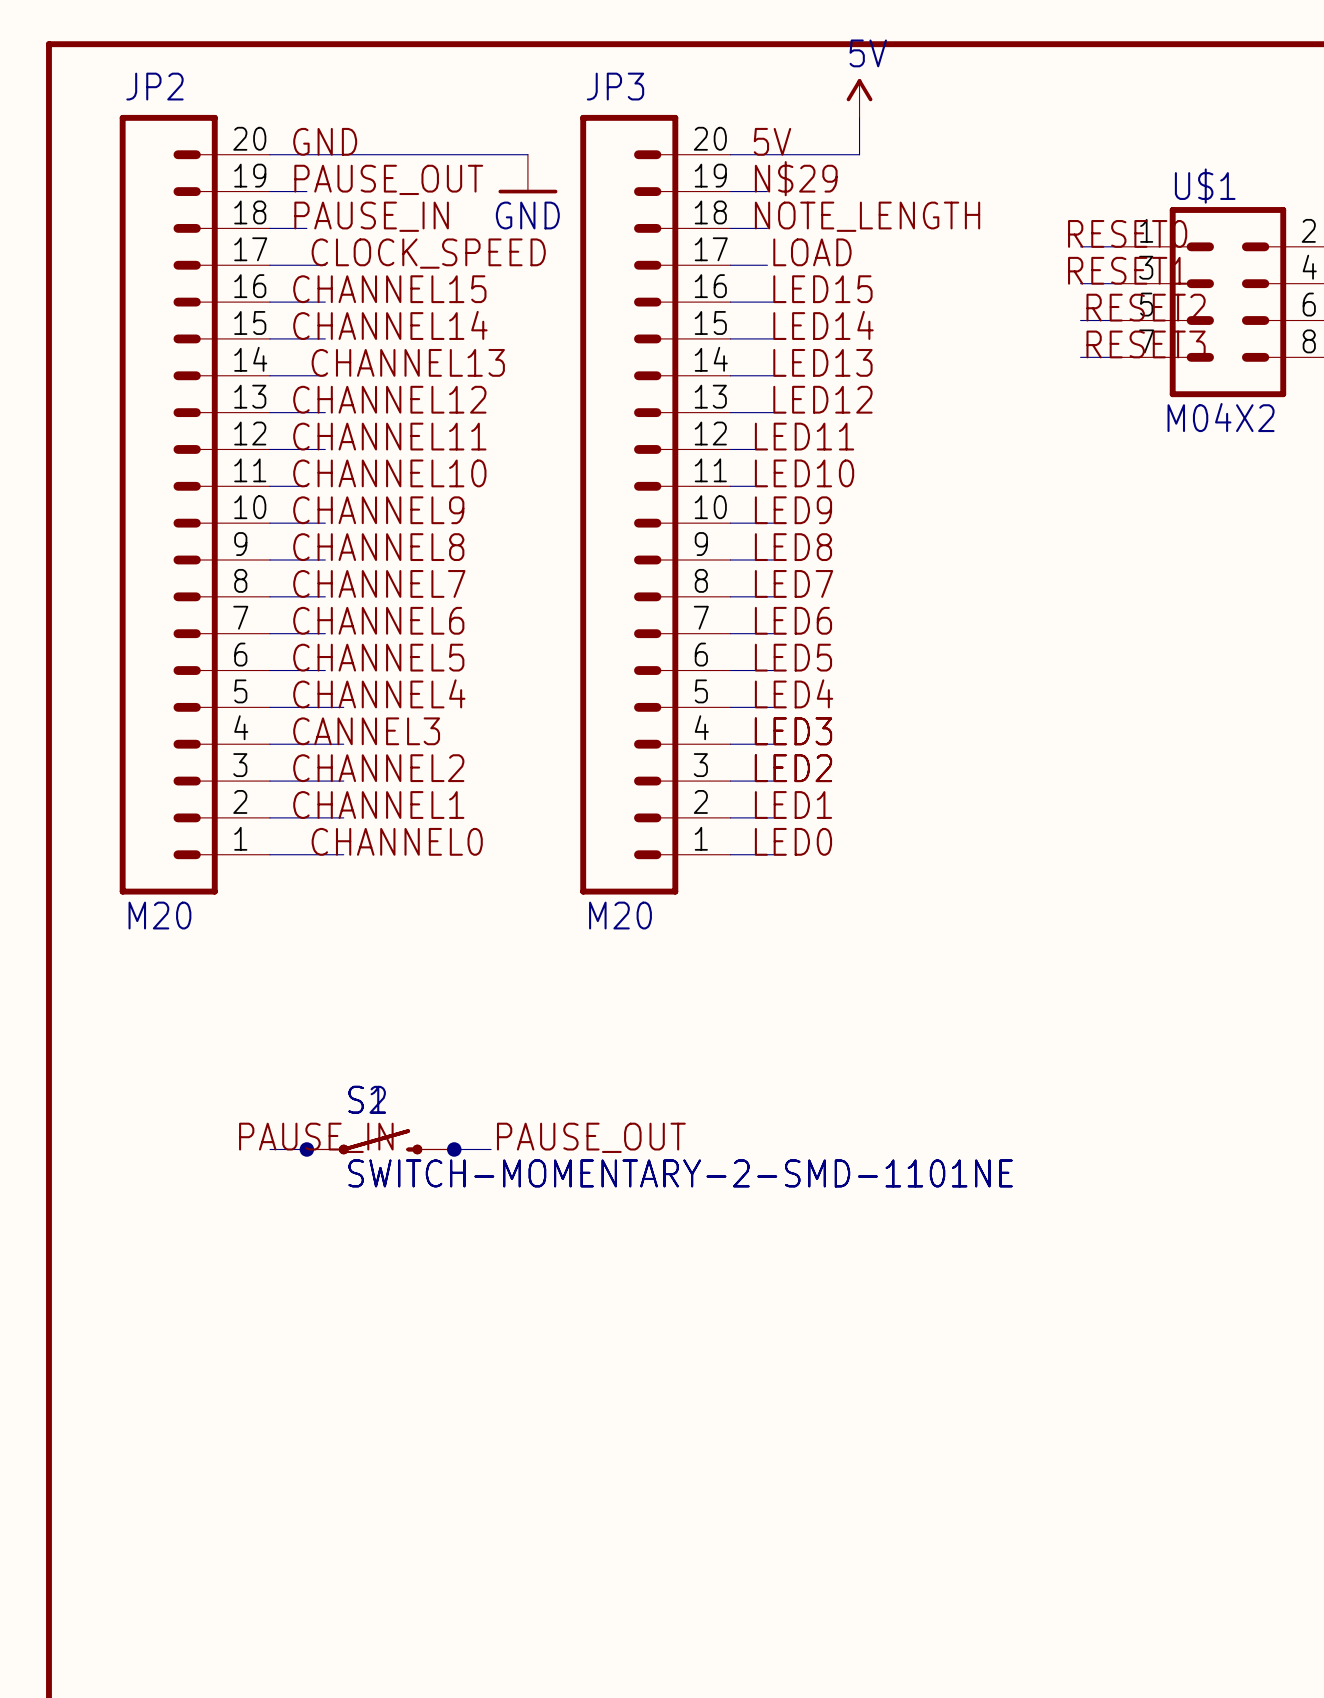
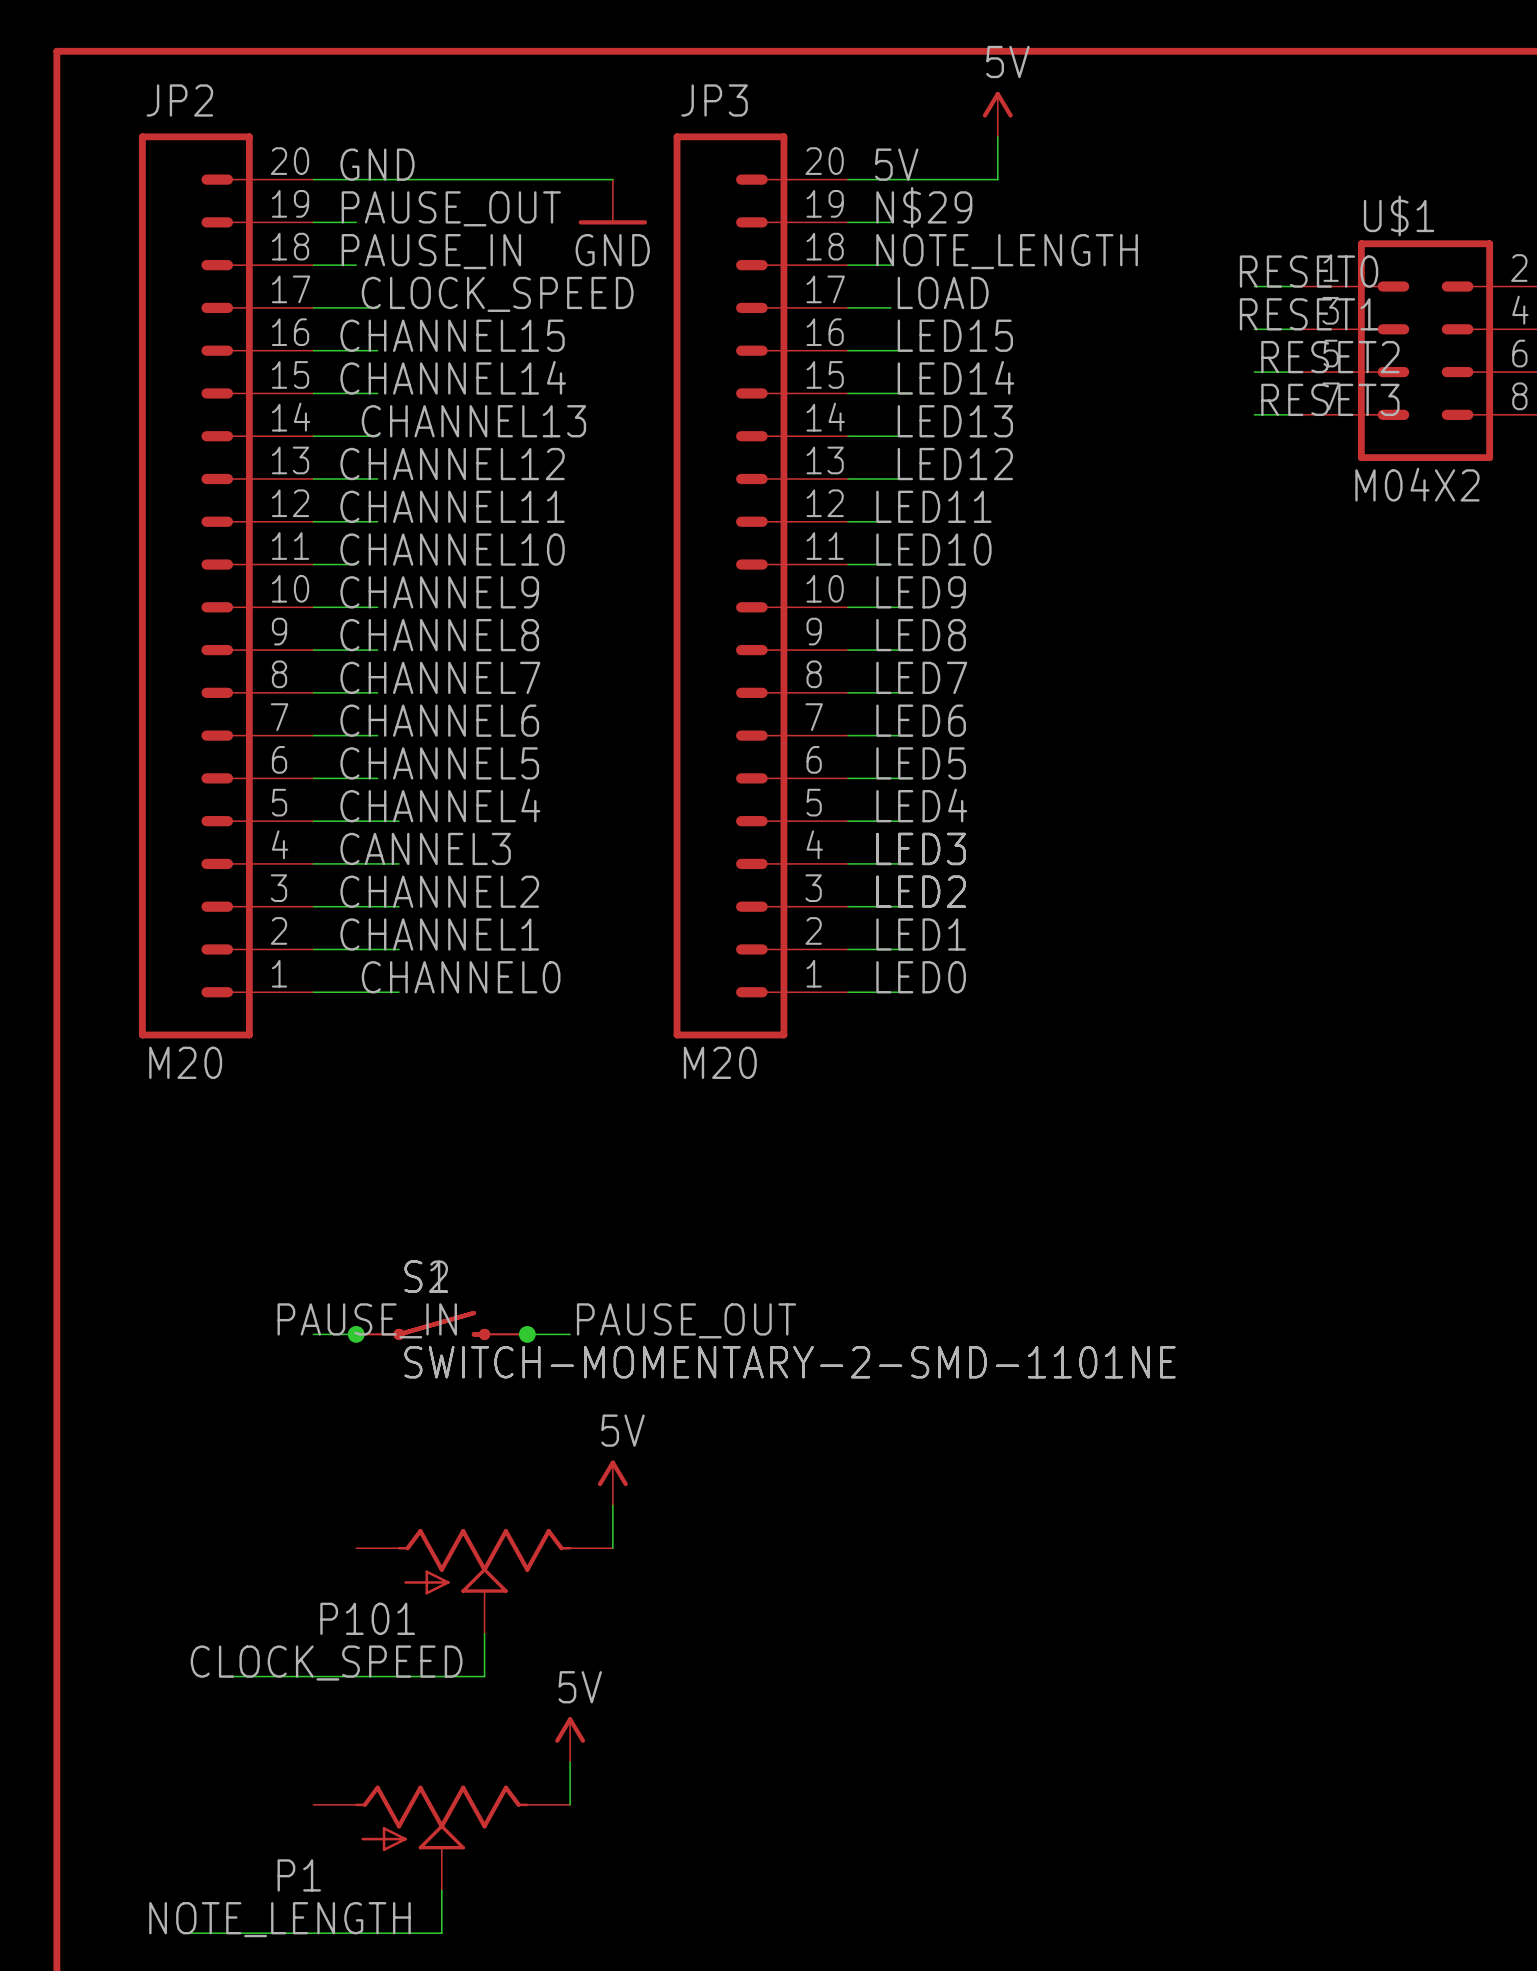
power symbol: none -> 5V (612, 1483)
wire: none -> (612, 1505) (612, 1548)
P101: none -> (484, 1581)
wire: none -> (484, 1633) (484, 1676) (227, 1676)
label: none -> CLOCK_SPEED (326, 1663)
power symbol: none -> 5V (570, 1739)
wire: none -> (570, 1762) (570, 1804)
P1: none -> (441, 1838)
wire: none -> (441, 1890) (441, 1933) (185, 1933)
label: none -> NOTE_LENGTH (279, 1919)

